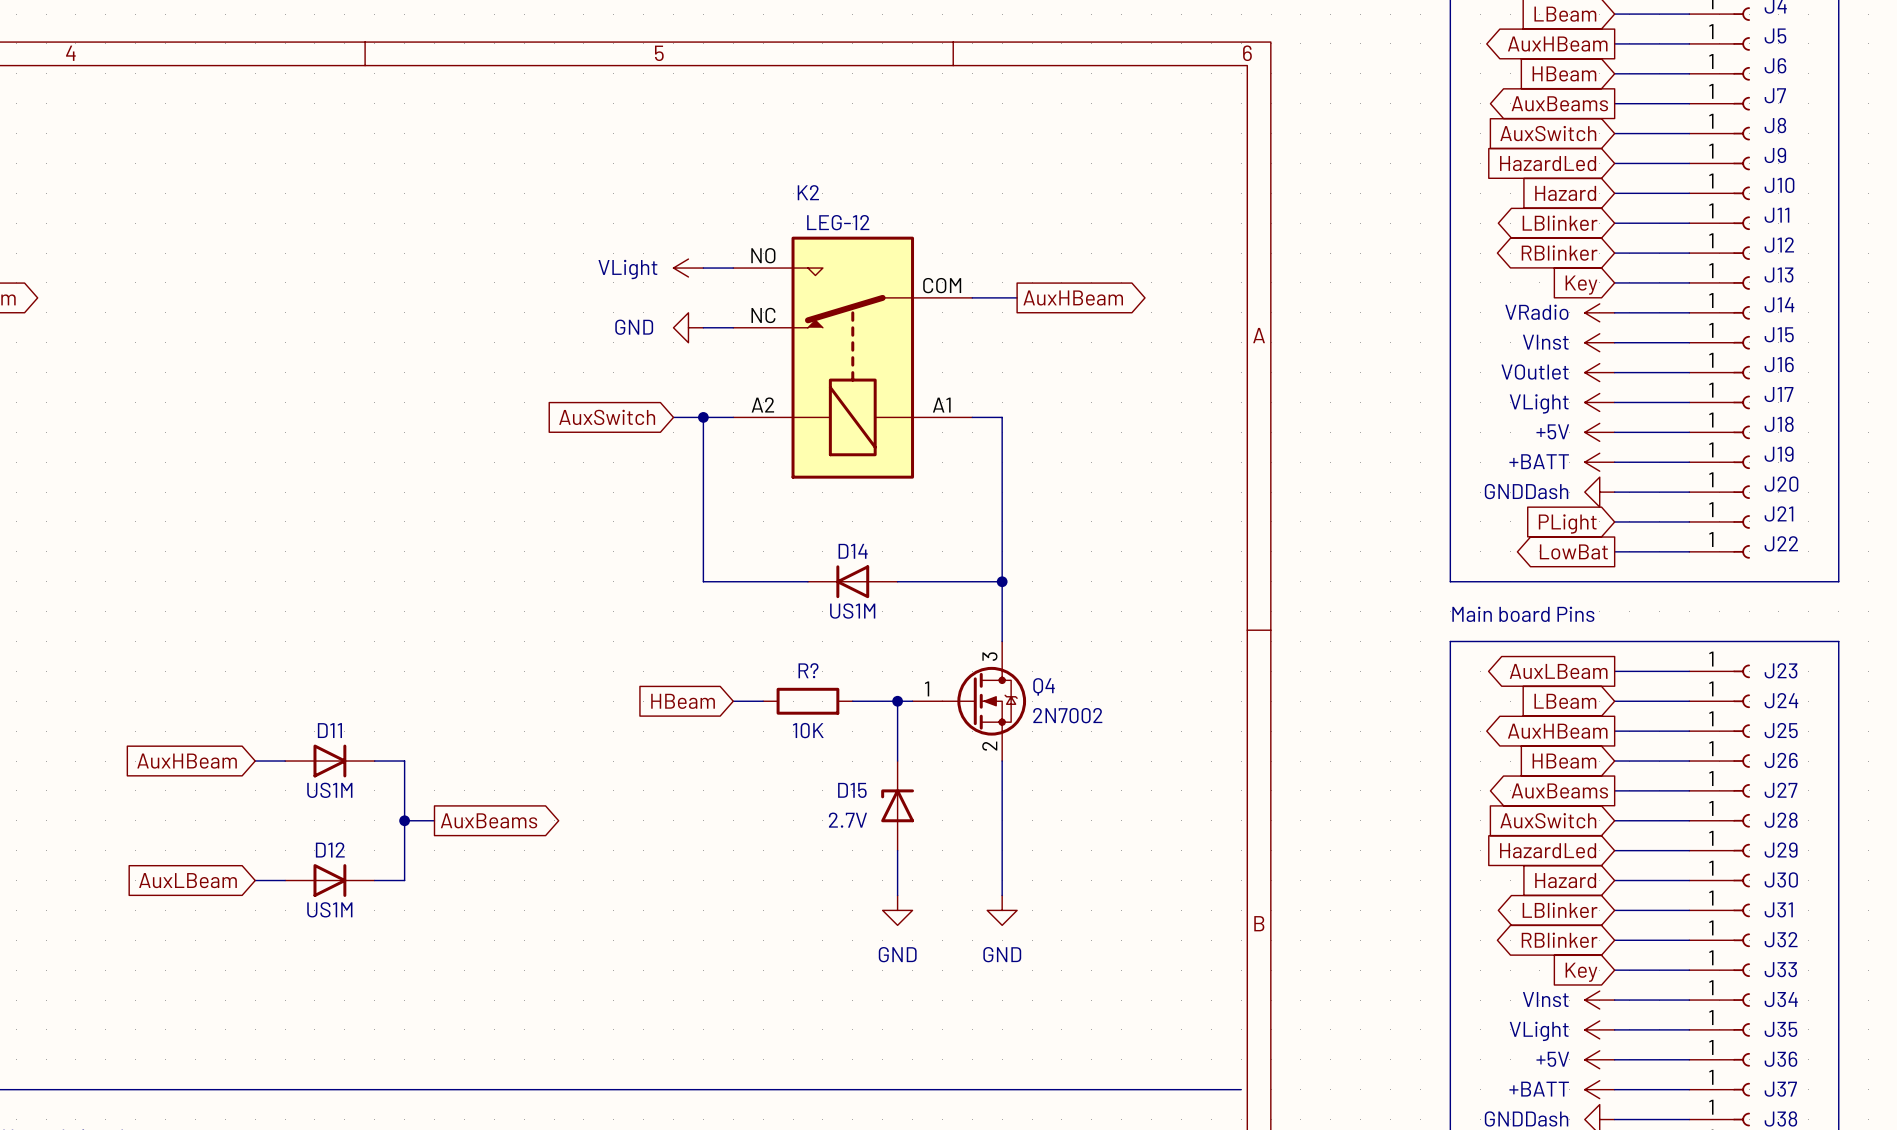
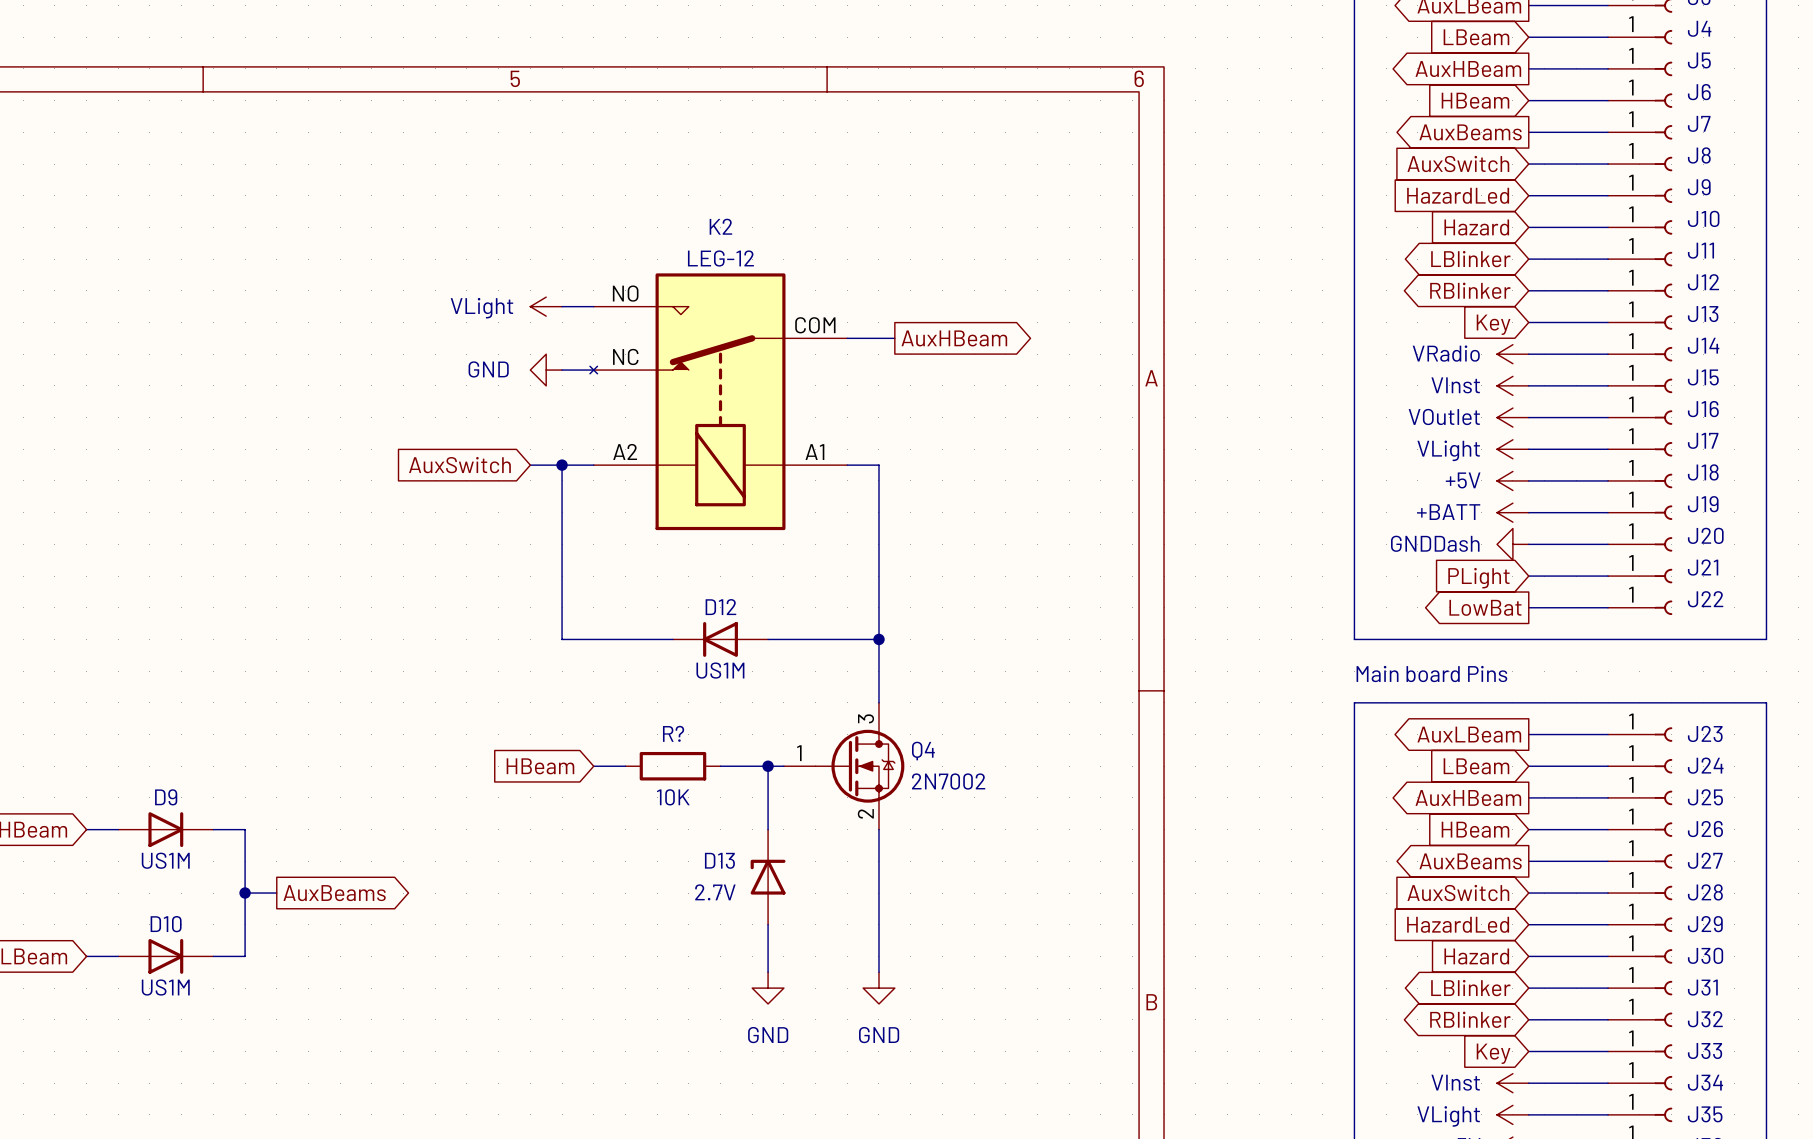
K2 name position: K2 (808, 192) -> K2 (720, 226)
K2 symbol: [733, 236, 973, 479] -> [589, 273, 848, 531]
D14 name: D14 (853, 551) -> D12 (720, 607)
D11 name: D11 (329, 730) -> D9 (166, 797)
D15 name: D15 (852, 790) -> D13 (719, 860)
D12 name: D12 (330, 850) -> D10 (166, 924)

